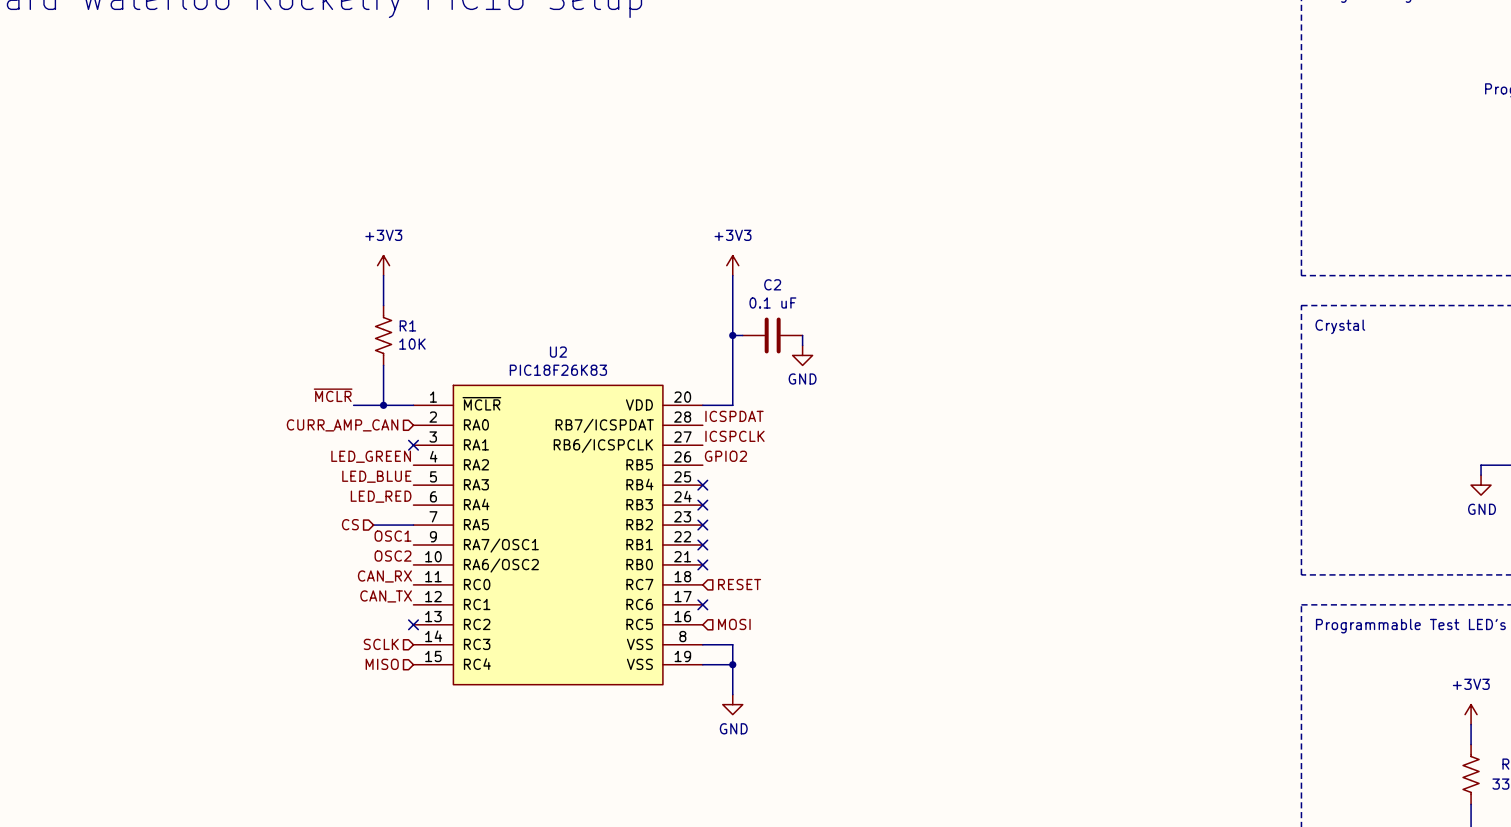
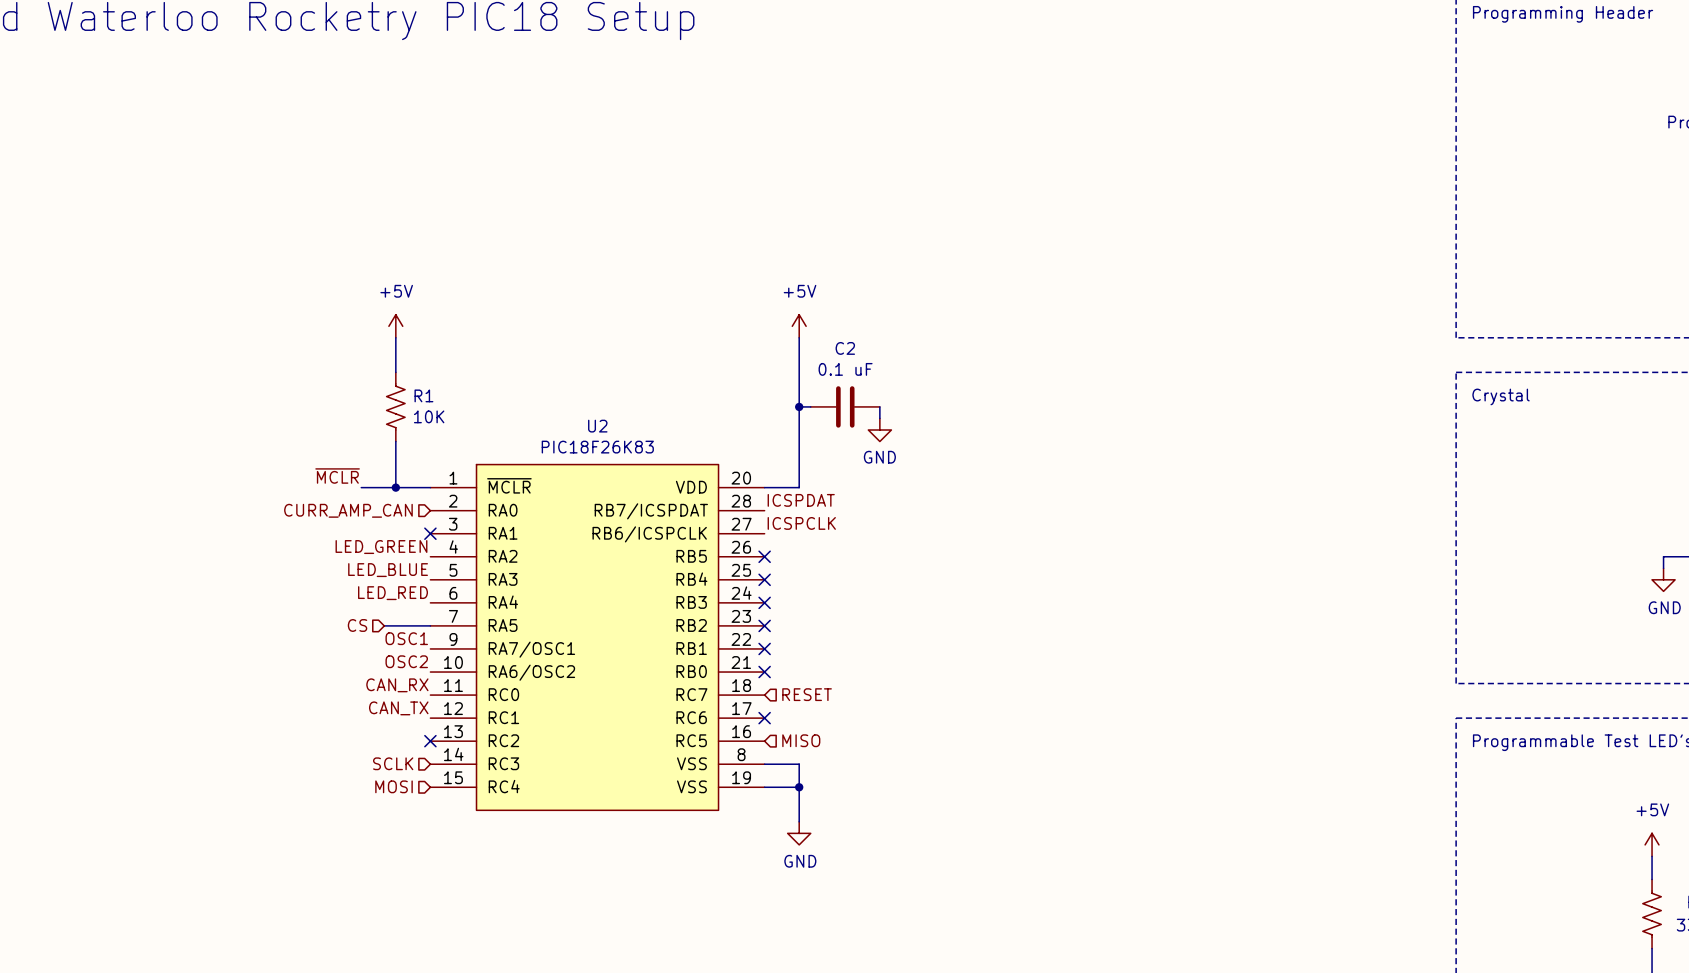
power symbol: +3V3 (383, 265) -> +5V (395, 326)
power symbol: +3V3 (732, 265) -> +5V (799, 326)
label: GPIO2 (725, 456) -> none
no-connect mark: none -> (764, 556)
hierarchical label: MOSI (734, 624) -> MISO (801, 740)
hierarchical label: MISO (382, 664) -> MOSI (394, 786)
power symbol: +3V3 (1471, 714) -> +5V (1652, 844)

